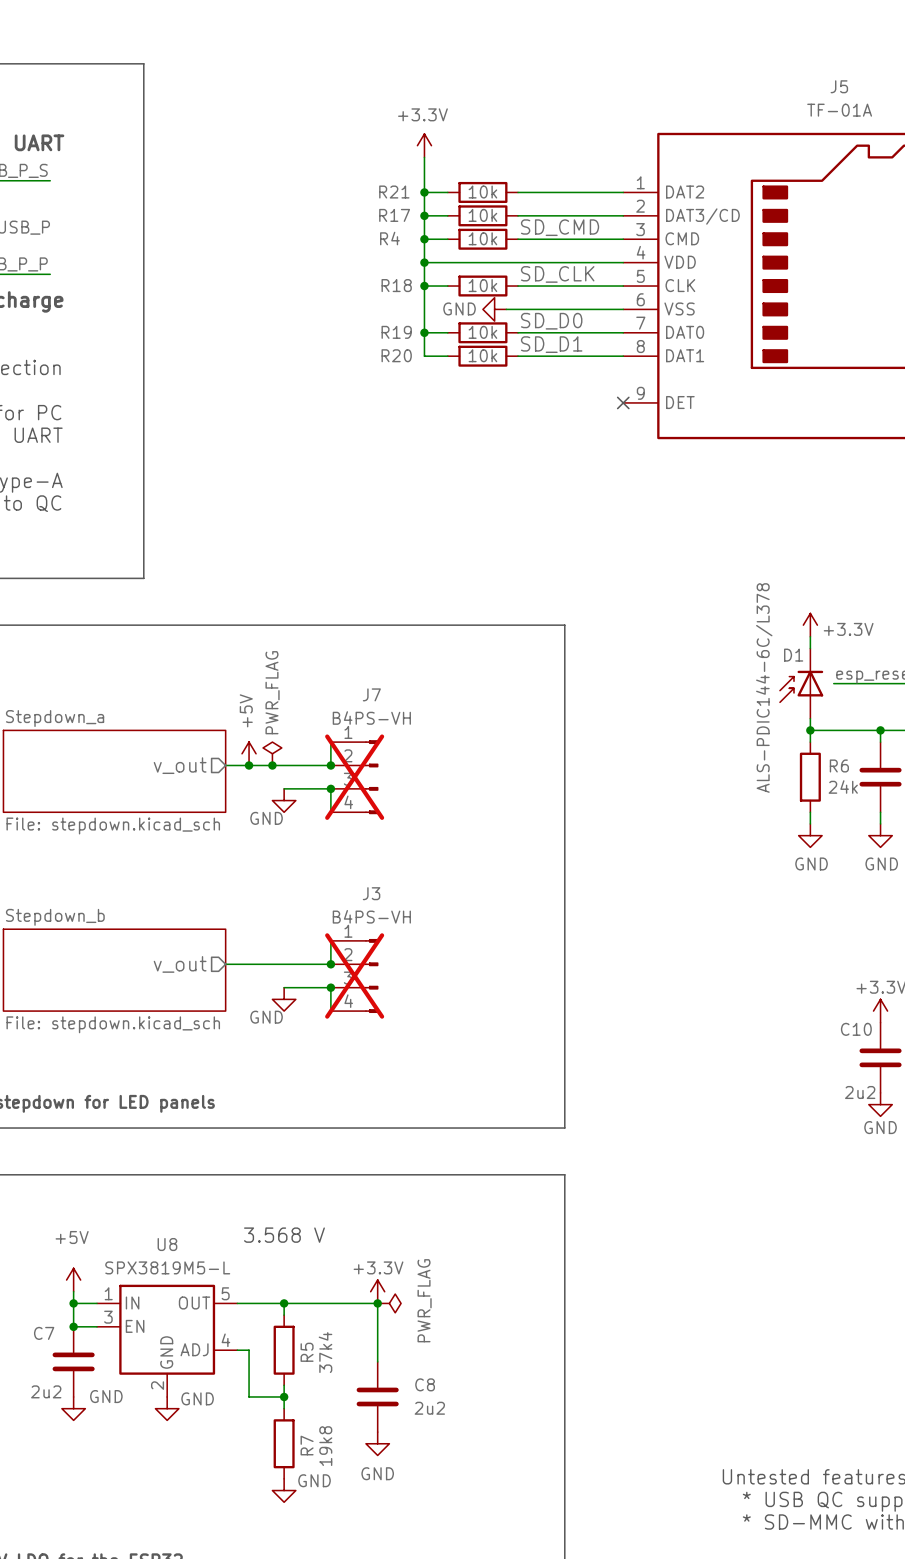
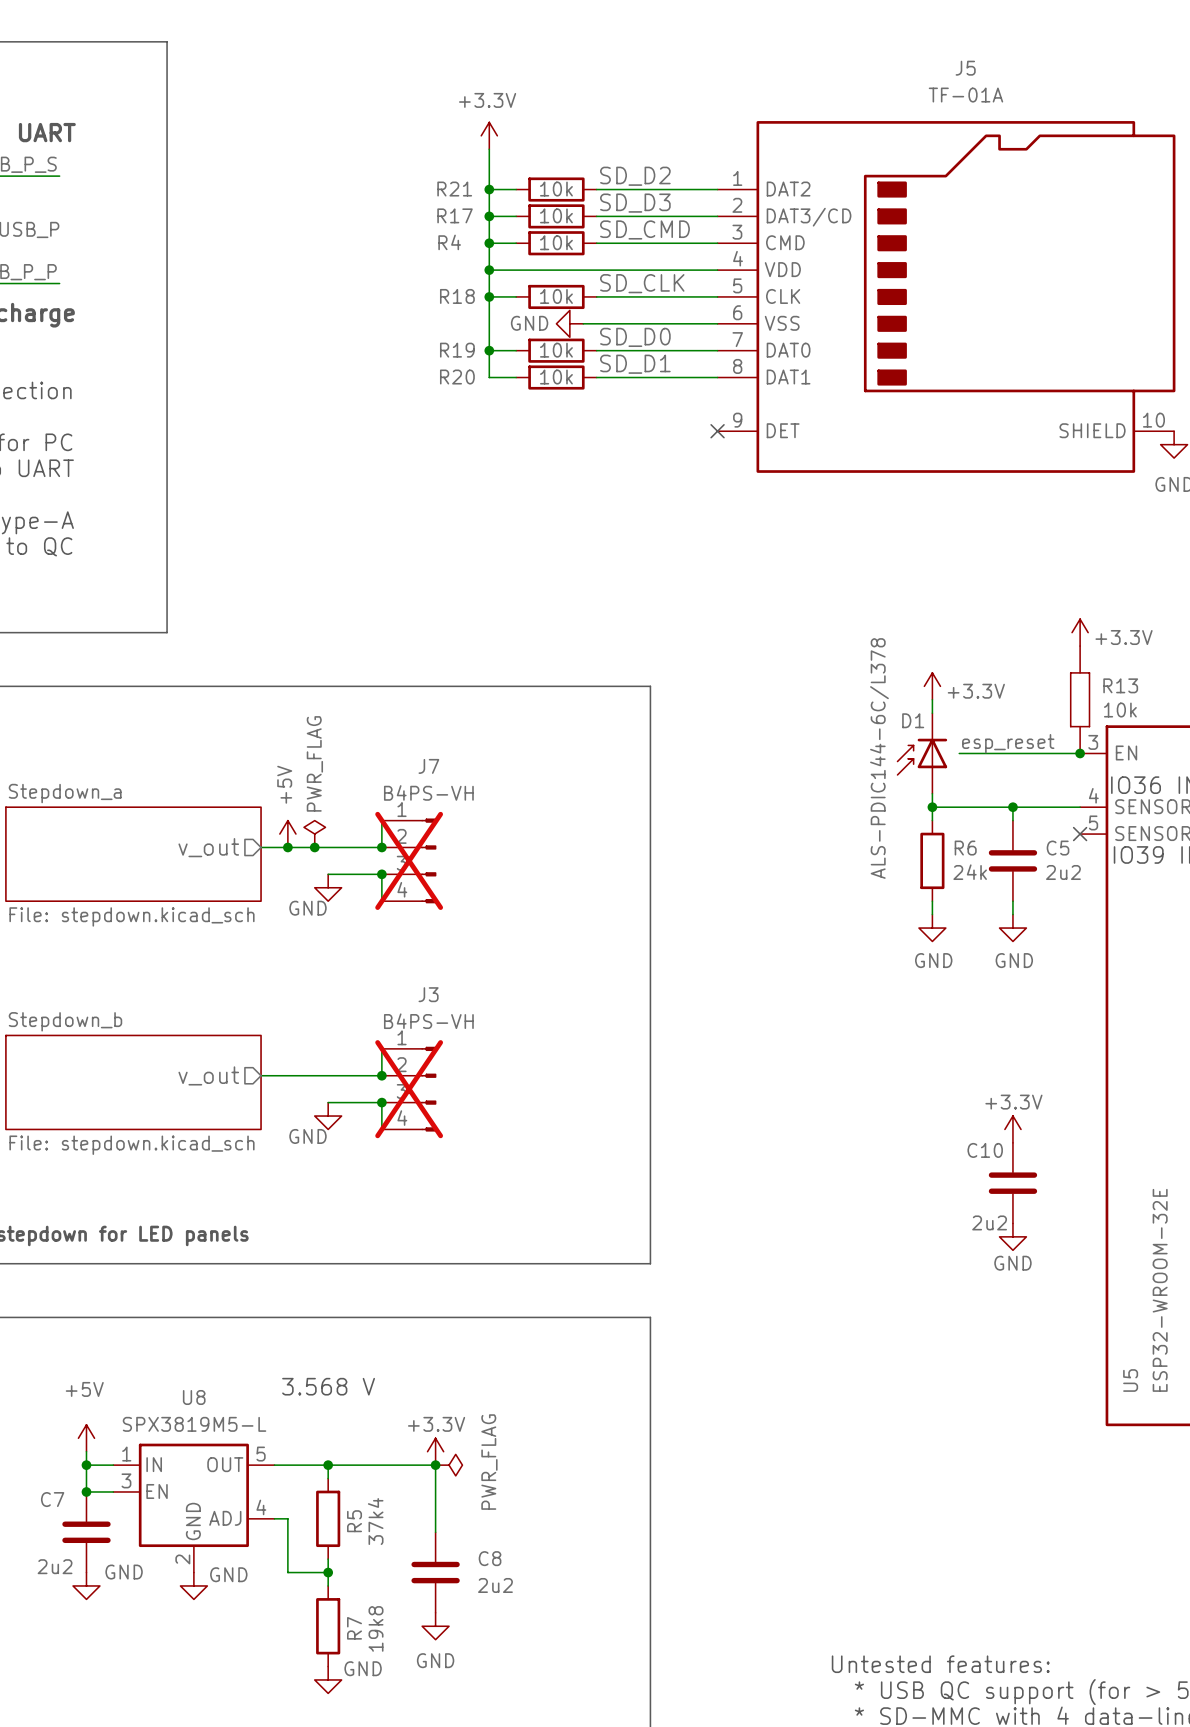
label: none -> SD_D2 (635, 176)
label: none -> SD_D3 (635, 203)

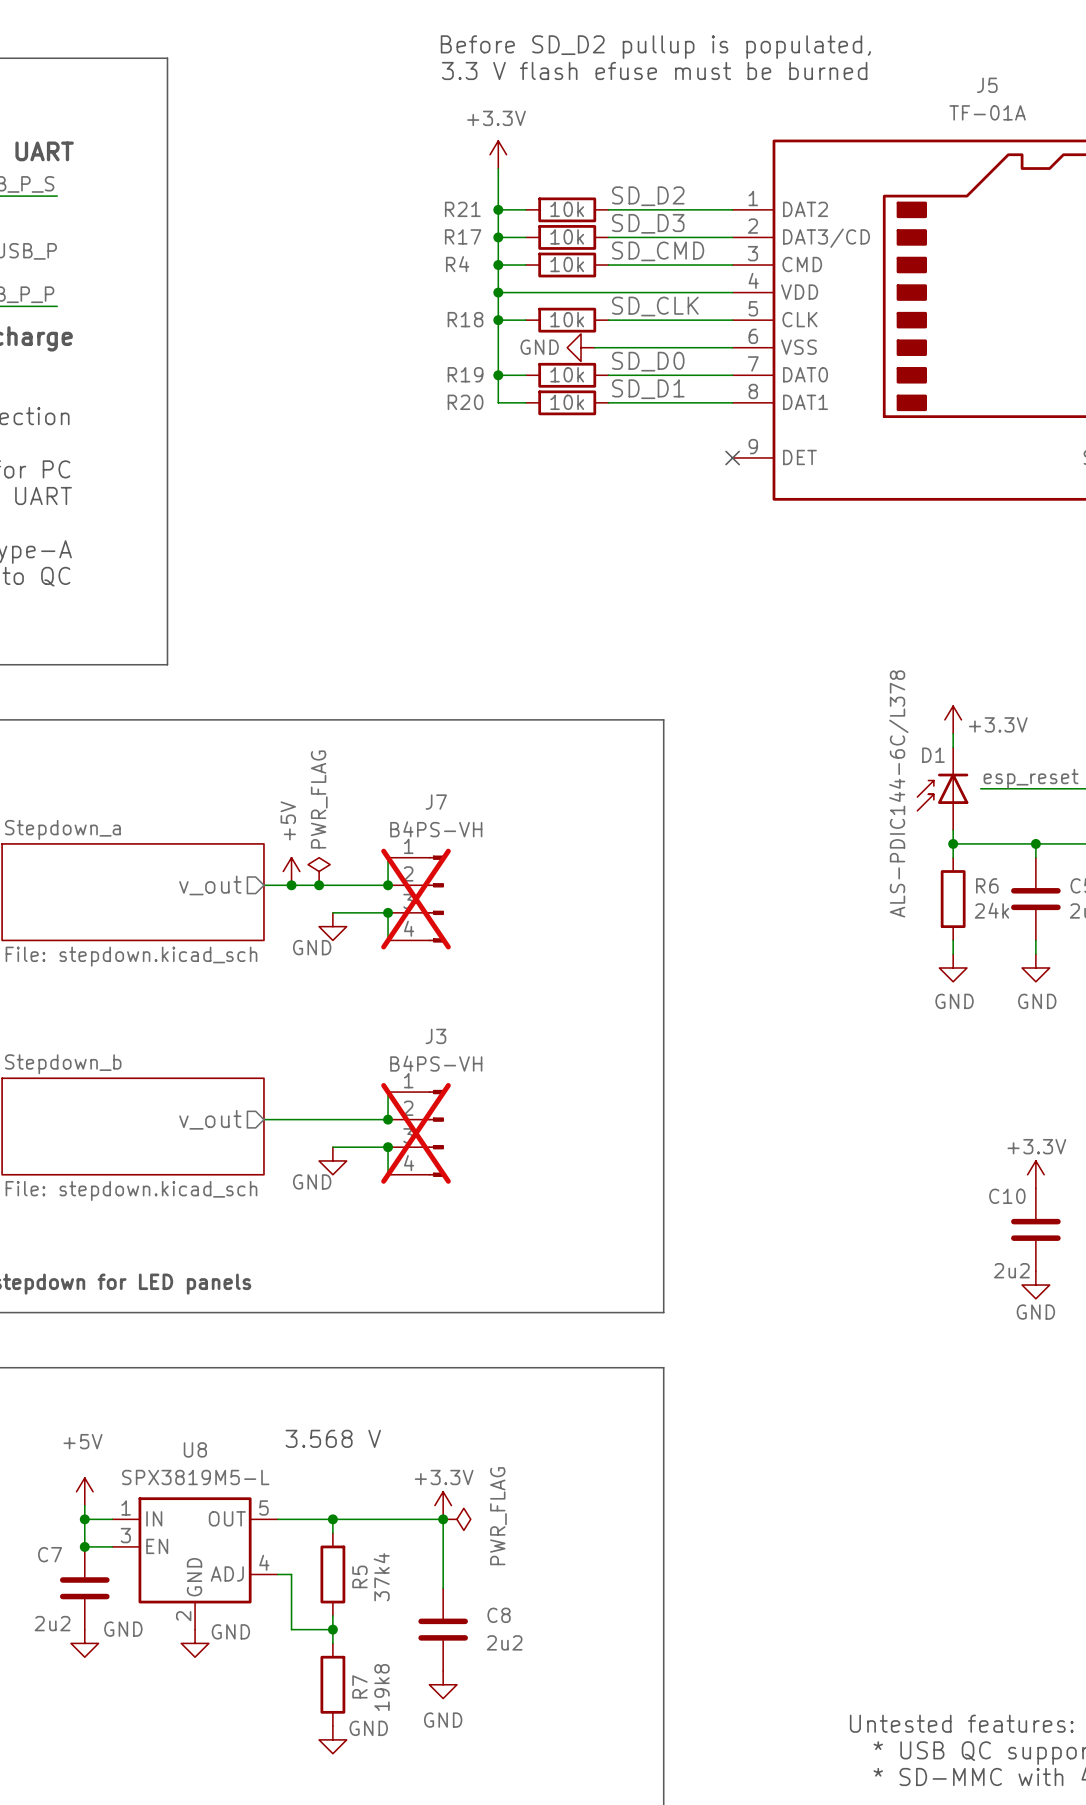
text: none -> Before SD_D2 pullup is populated, (655, 47)
text: none -> 3.3 V flash efuse must be burned (654, 70)

